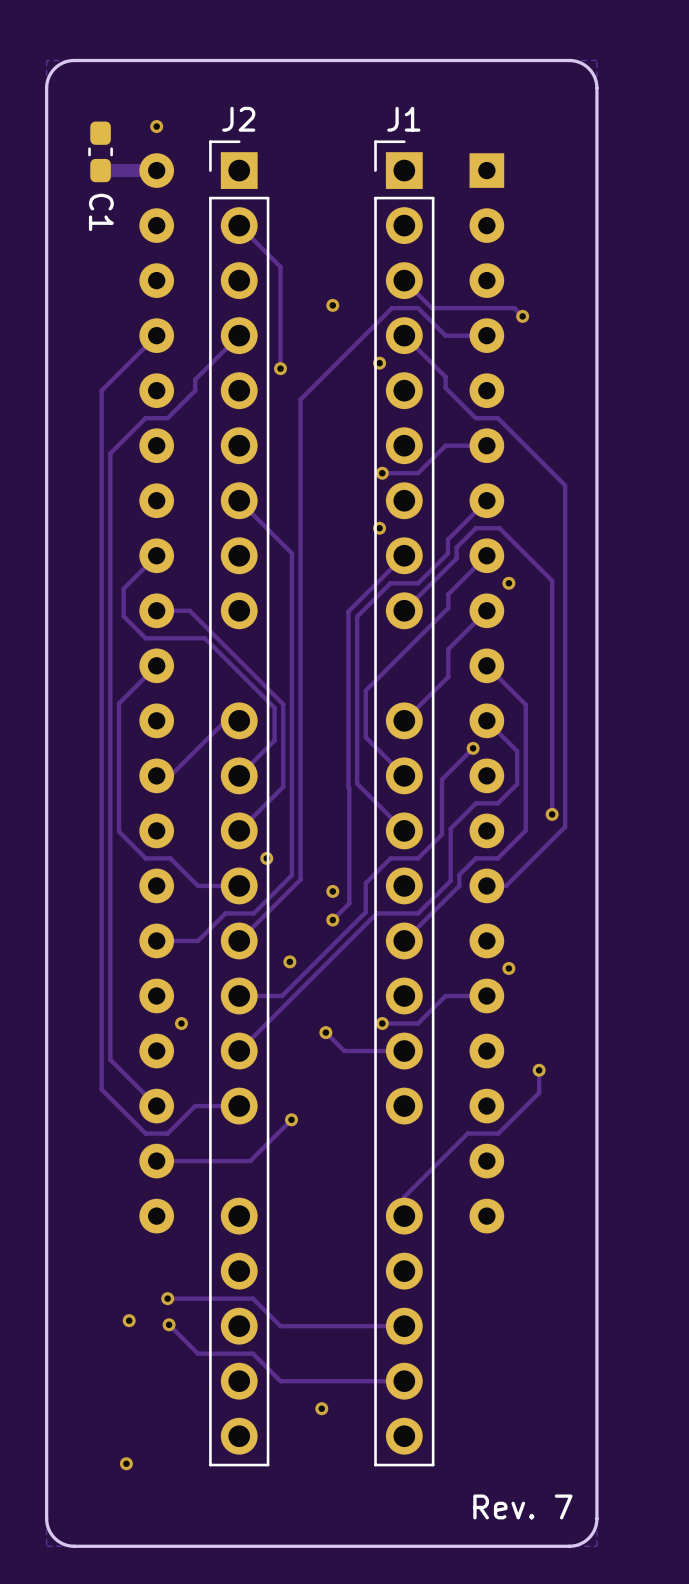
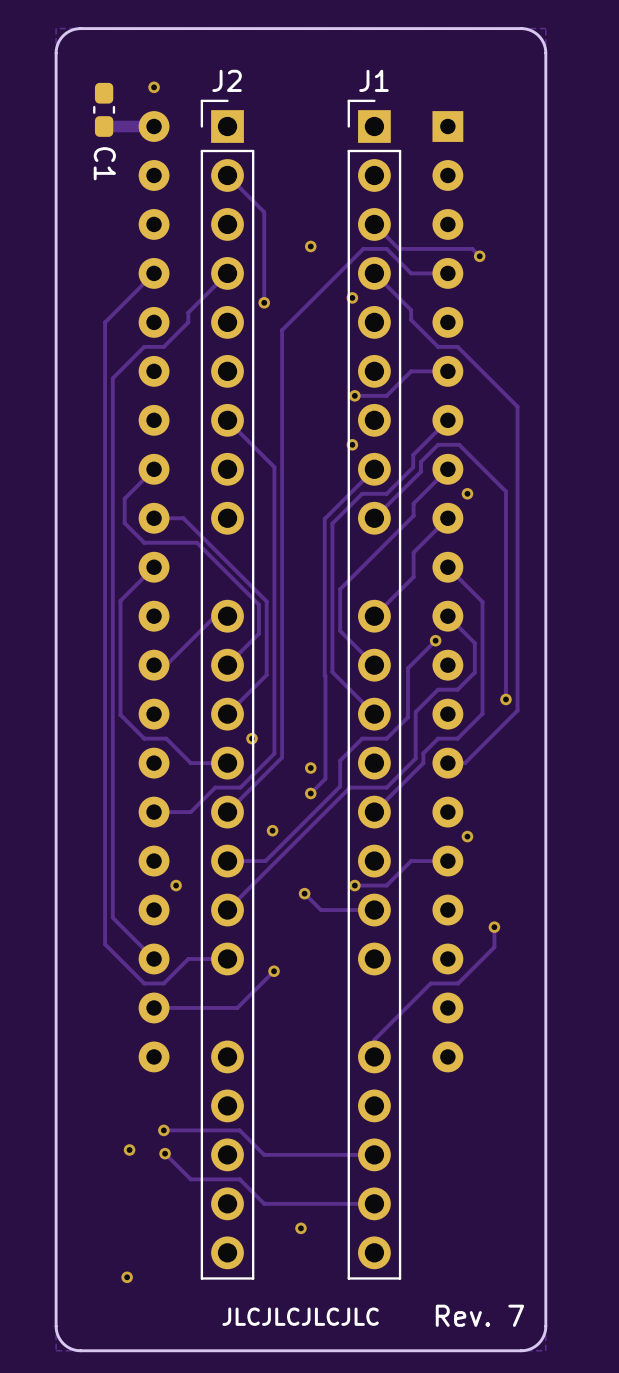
text: none -> JLCJLCJLCJLC (300, 1316)

